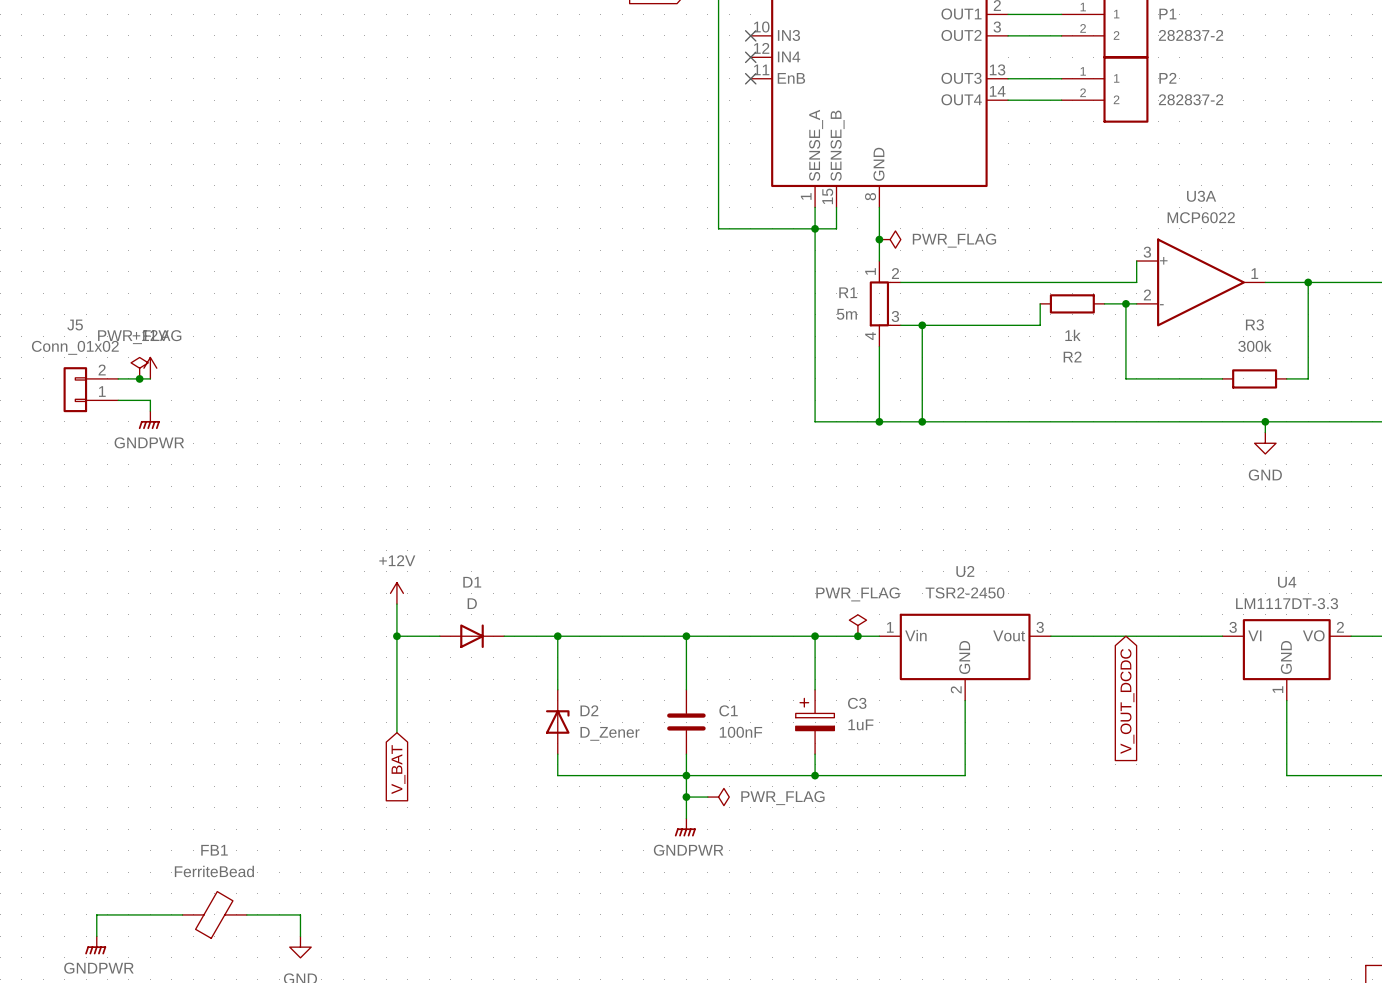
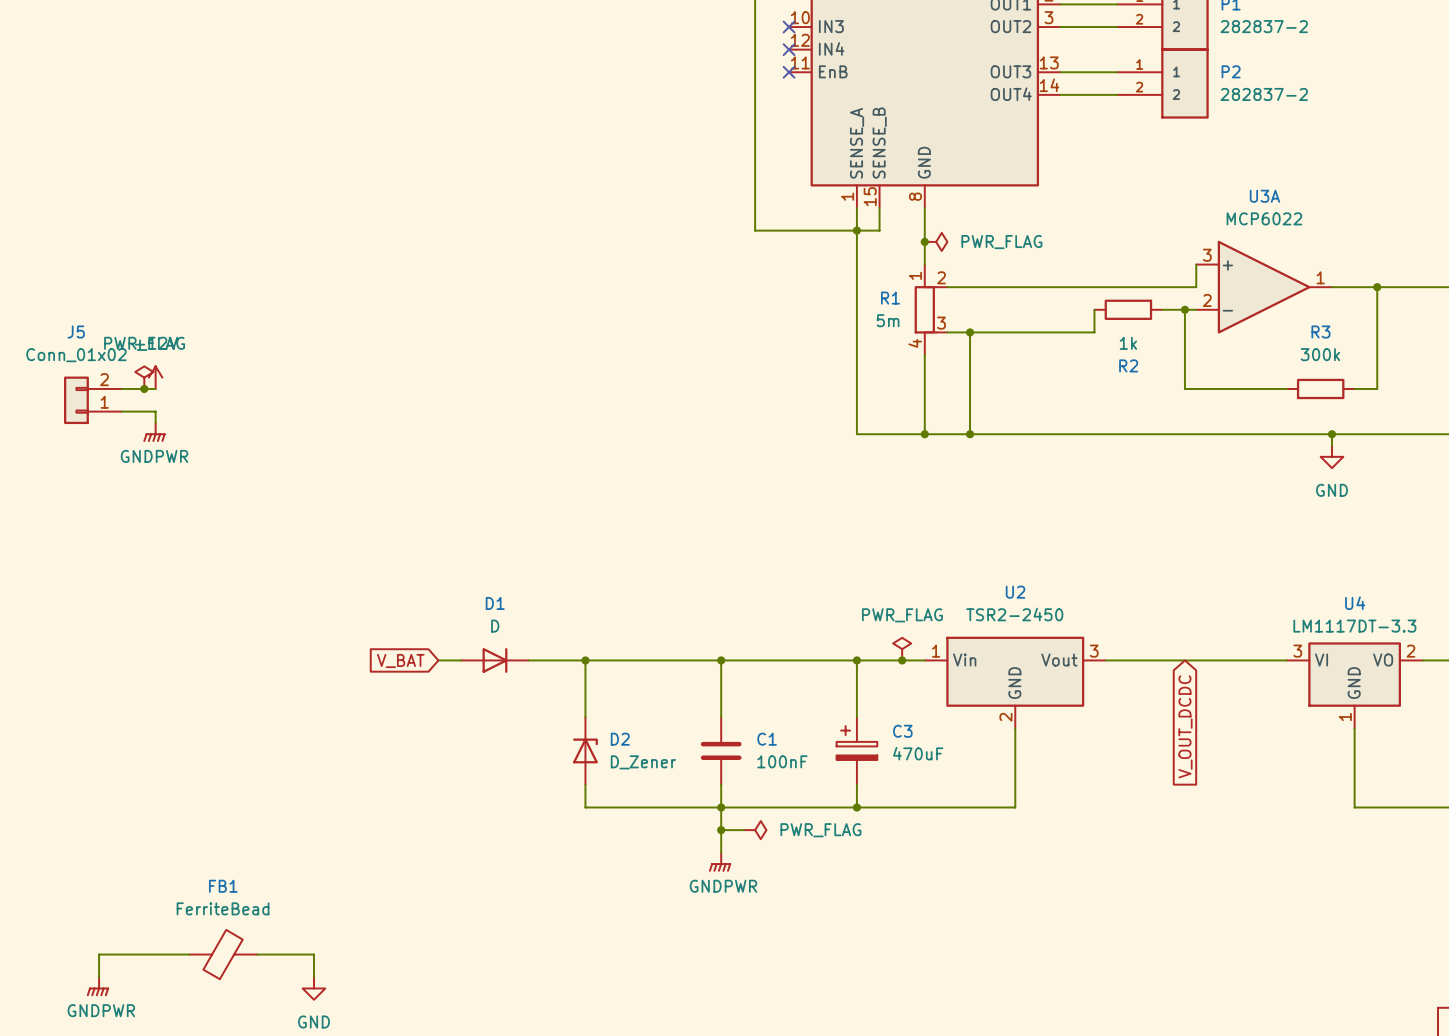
power symbol: +12V (396, 593) -> none
wire: (396, 604) (396, 732) -> none
wire: (396, 636) (418, 636) -> none
junction: (396, 636) -> none
C3 value: 1uF (860, 724) -> 470uF (918, 753)
global label rotation: 0° (398, 769) -> 90° clockwise (400, 660)
global label position: V_BAT (398, 769) -> V_BAT (400, 660)

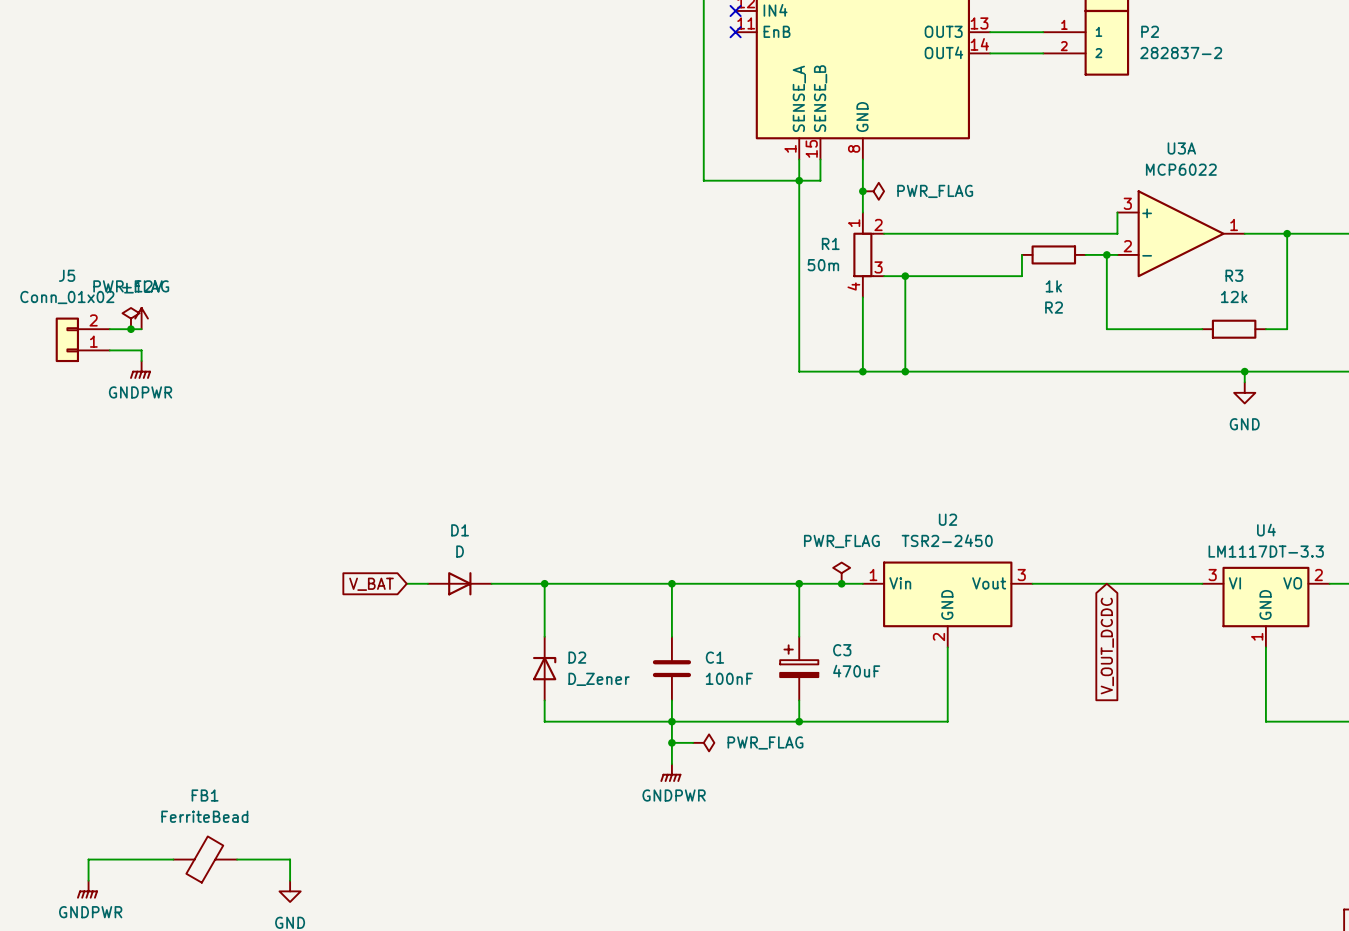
R1 value: 5m (888, 320) -> 50m (823, 265)
R3 value: 300k (1320, 354) -> 12k (1234, 296)

